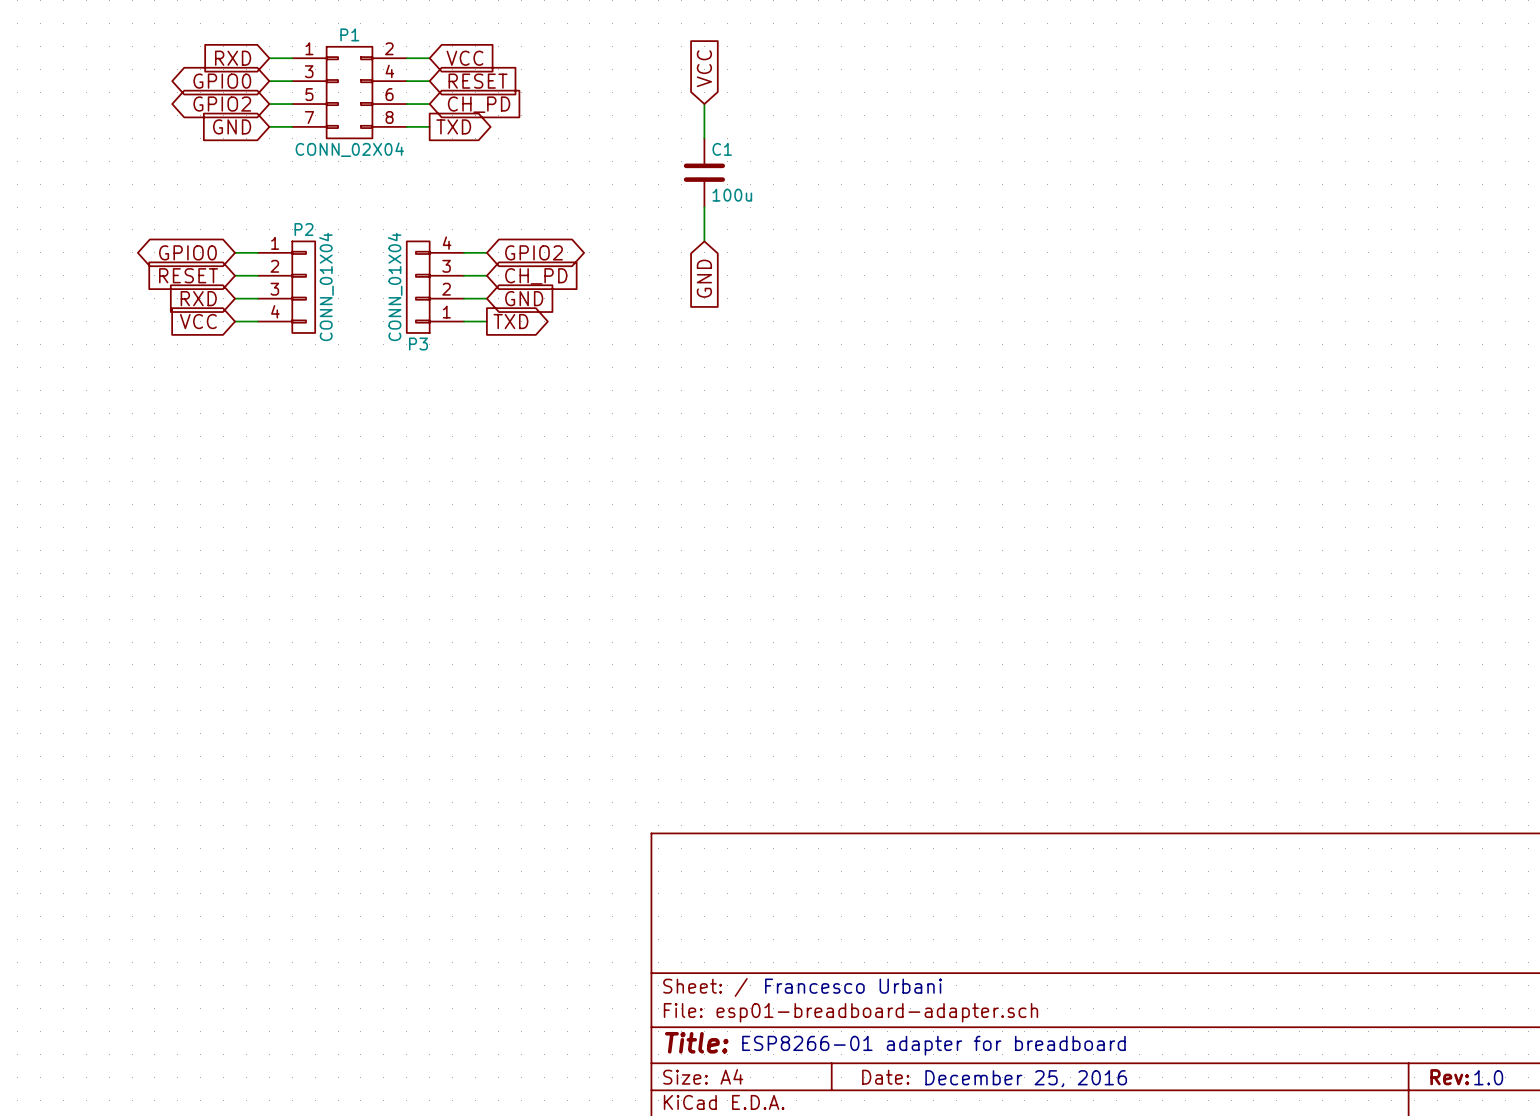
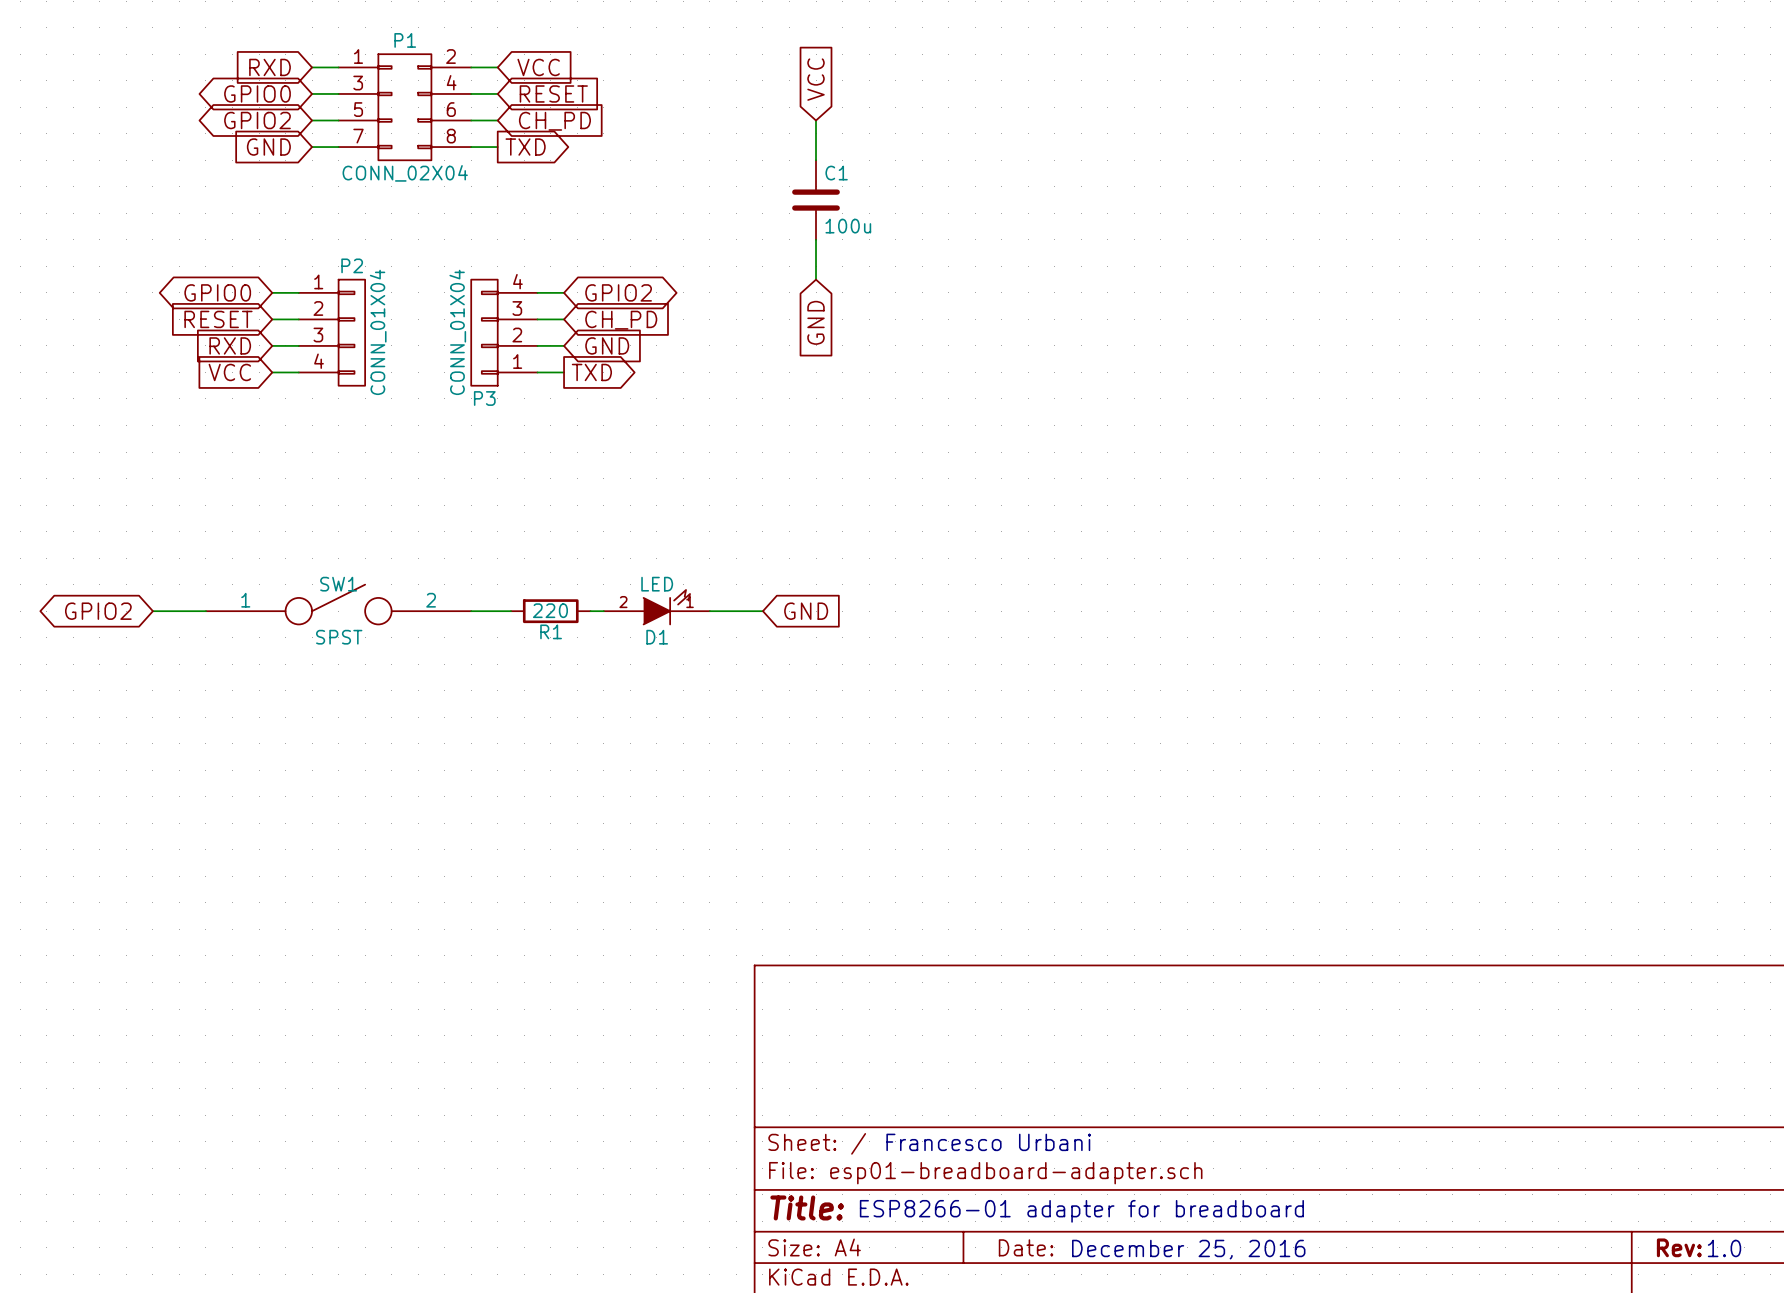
SW1: none -> SPST (338, 604)
D1: none -> LED (656, 607)
global label: none -> GPIO2 (98, 611)
wire: none -> (152, 611) (205, 611)
wire: none -> (471, 611) (510, 611)
R1: none -> 220 (550, 611)
wire: none -> (590, 611) (603, 611)
wire: none -> (709, 611) (762, 611)
global label: none -> GND (806, 611)

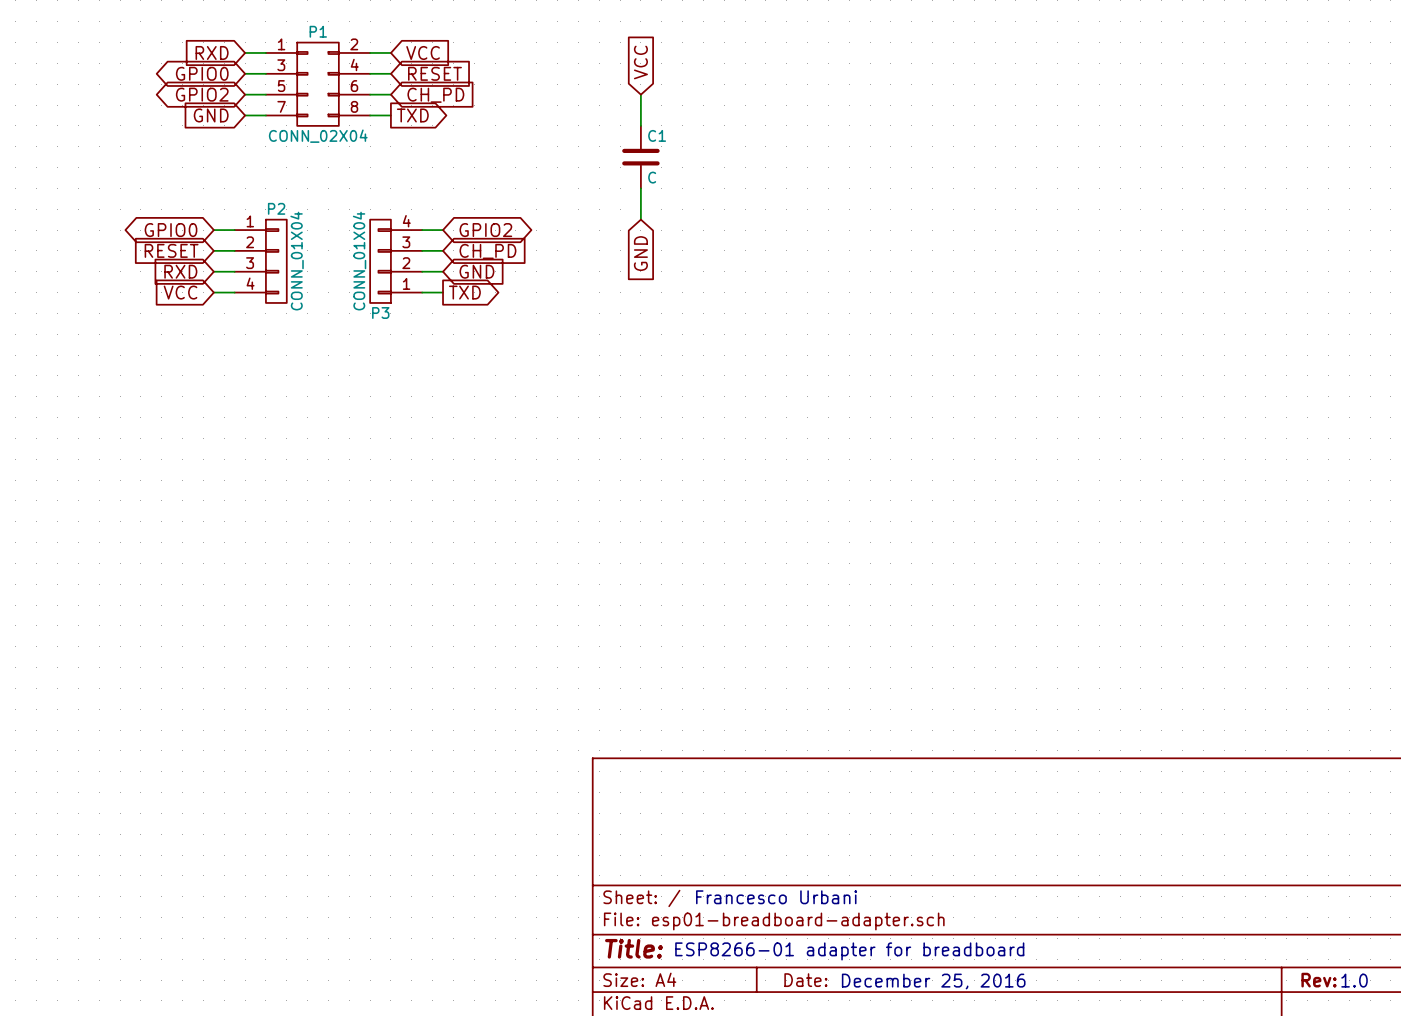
C1 value: 100u (848, 226) -> C (652, 177)
SW1: SPST (338, 604) -> none
D1: LED (656, 607) -> none
global label: GPIO2 (98, 611) -> none
wire: (152, 611) (205, 611) -> none
wire: (471, 611) (510, 611) -> none
R1: 220 (550, 611) -> none
wire: (590, 611) (603, 611) -> none
wire: (709, 611) (762, 611) -> none
global label: GND (806, 611) -> none

